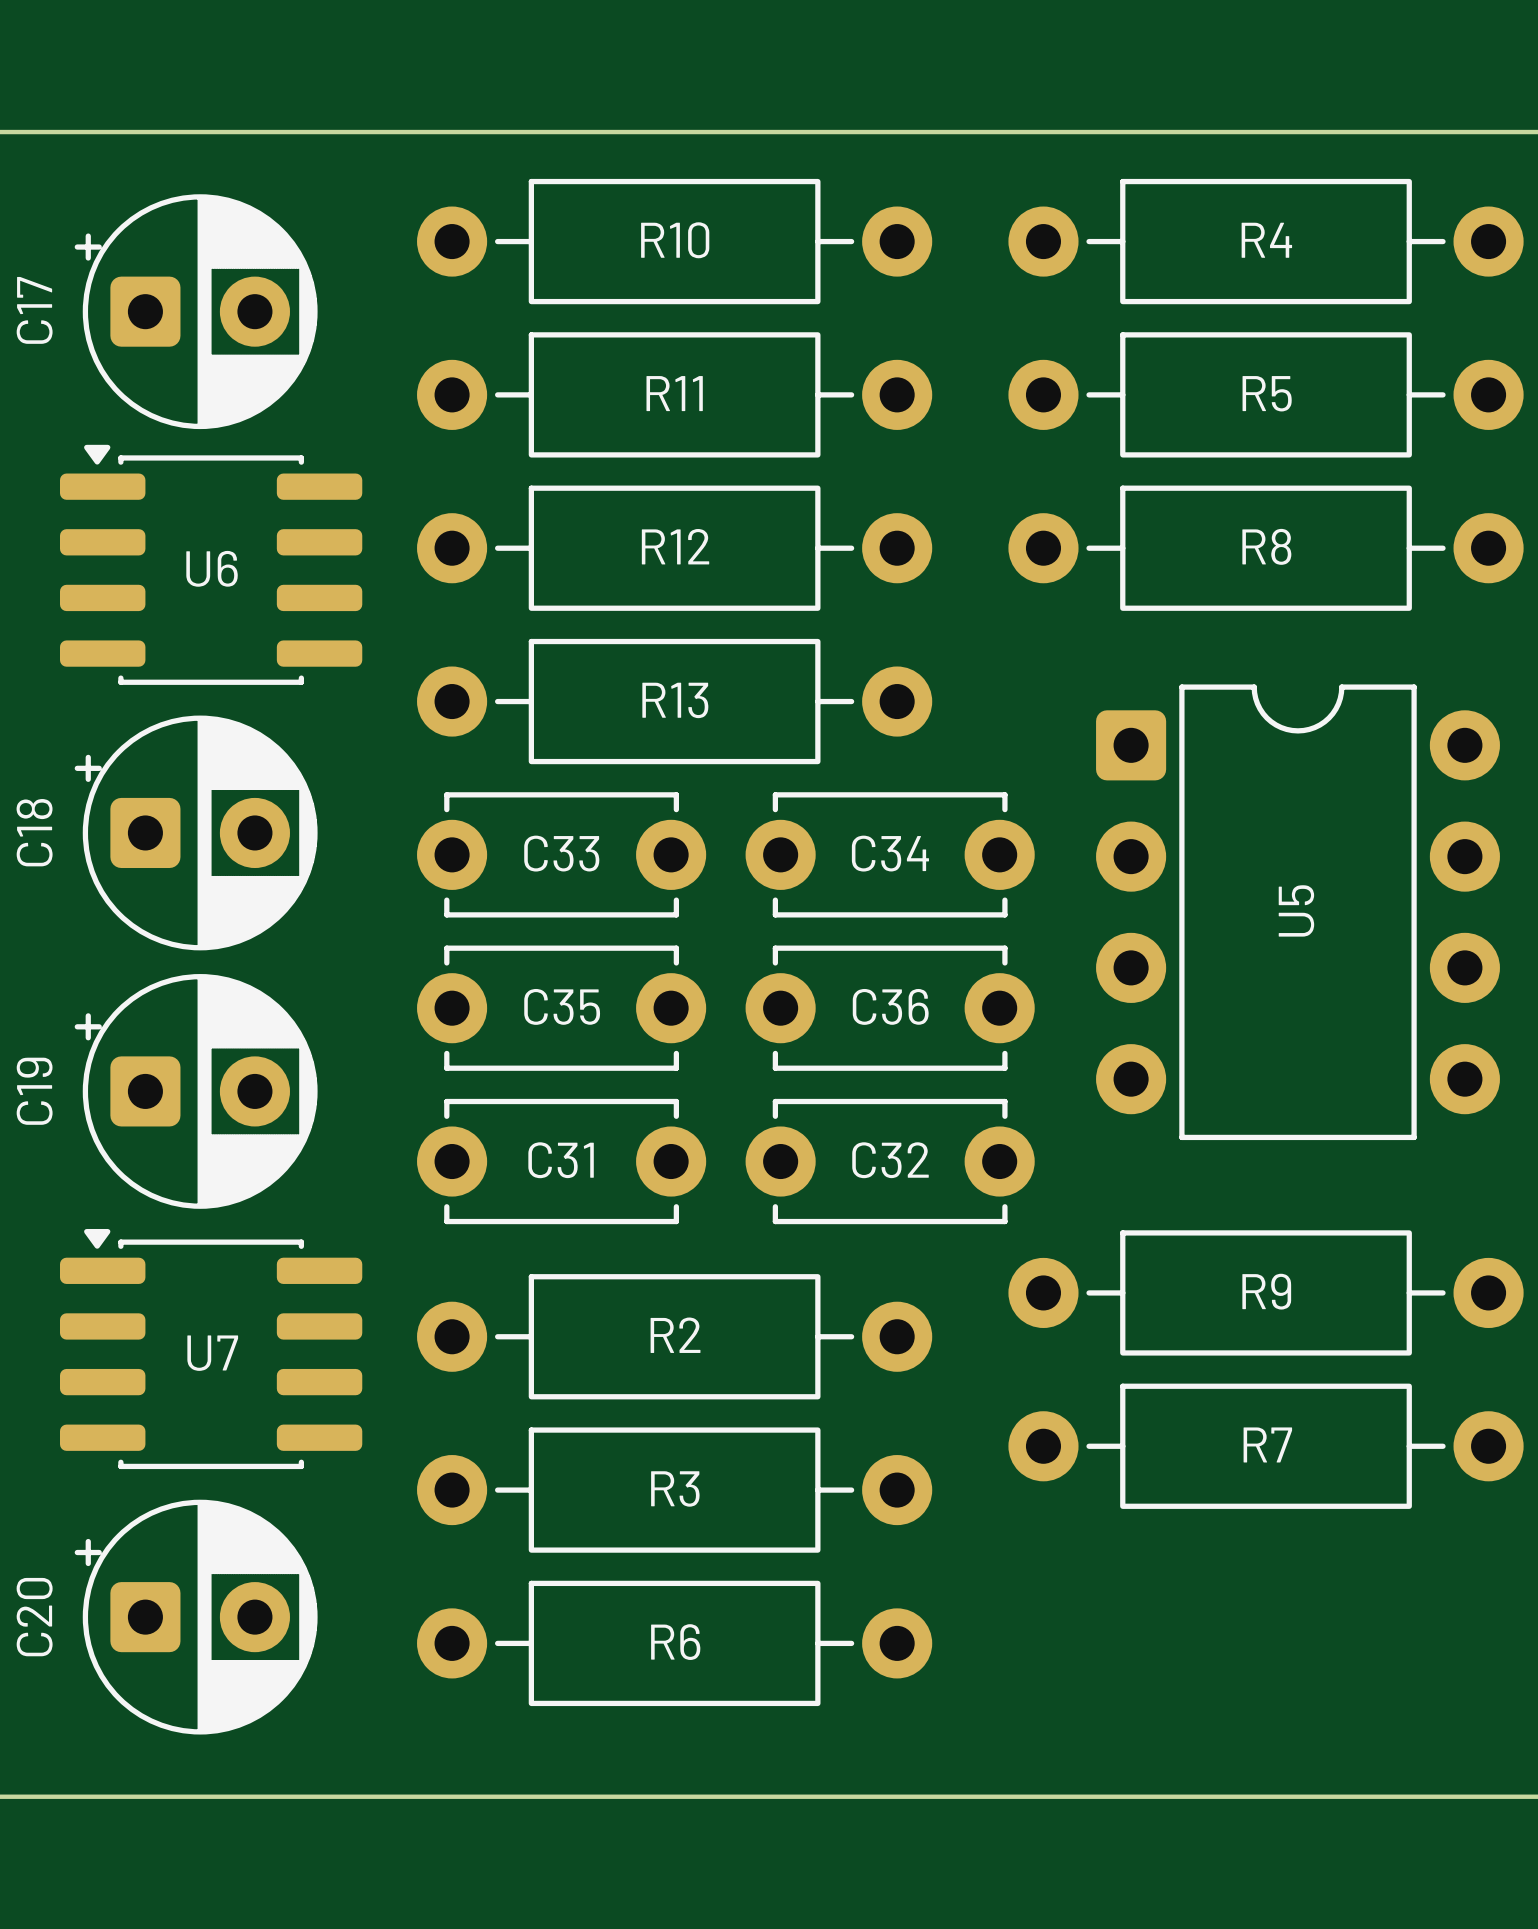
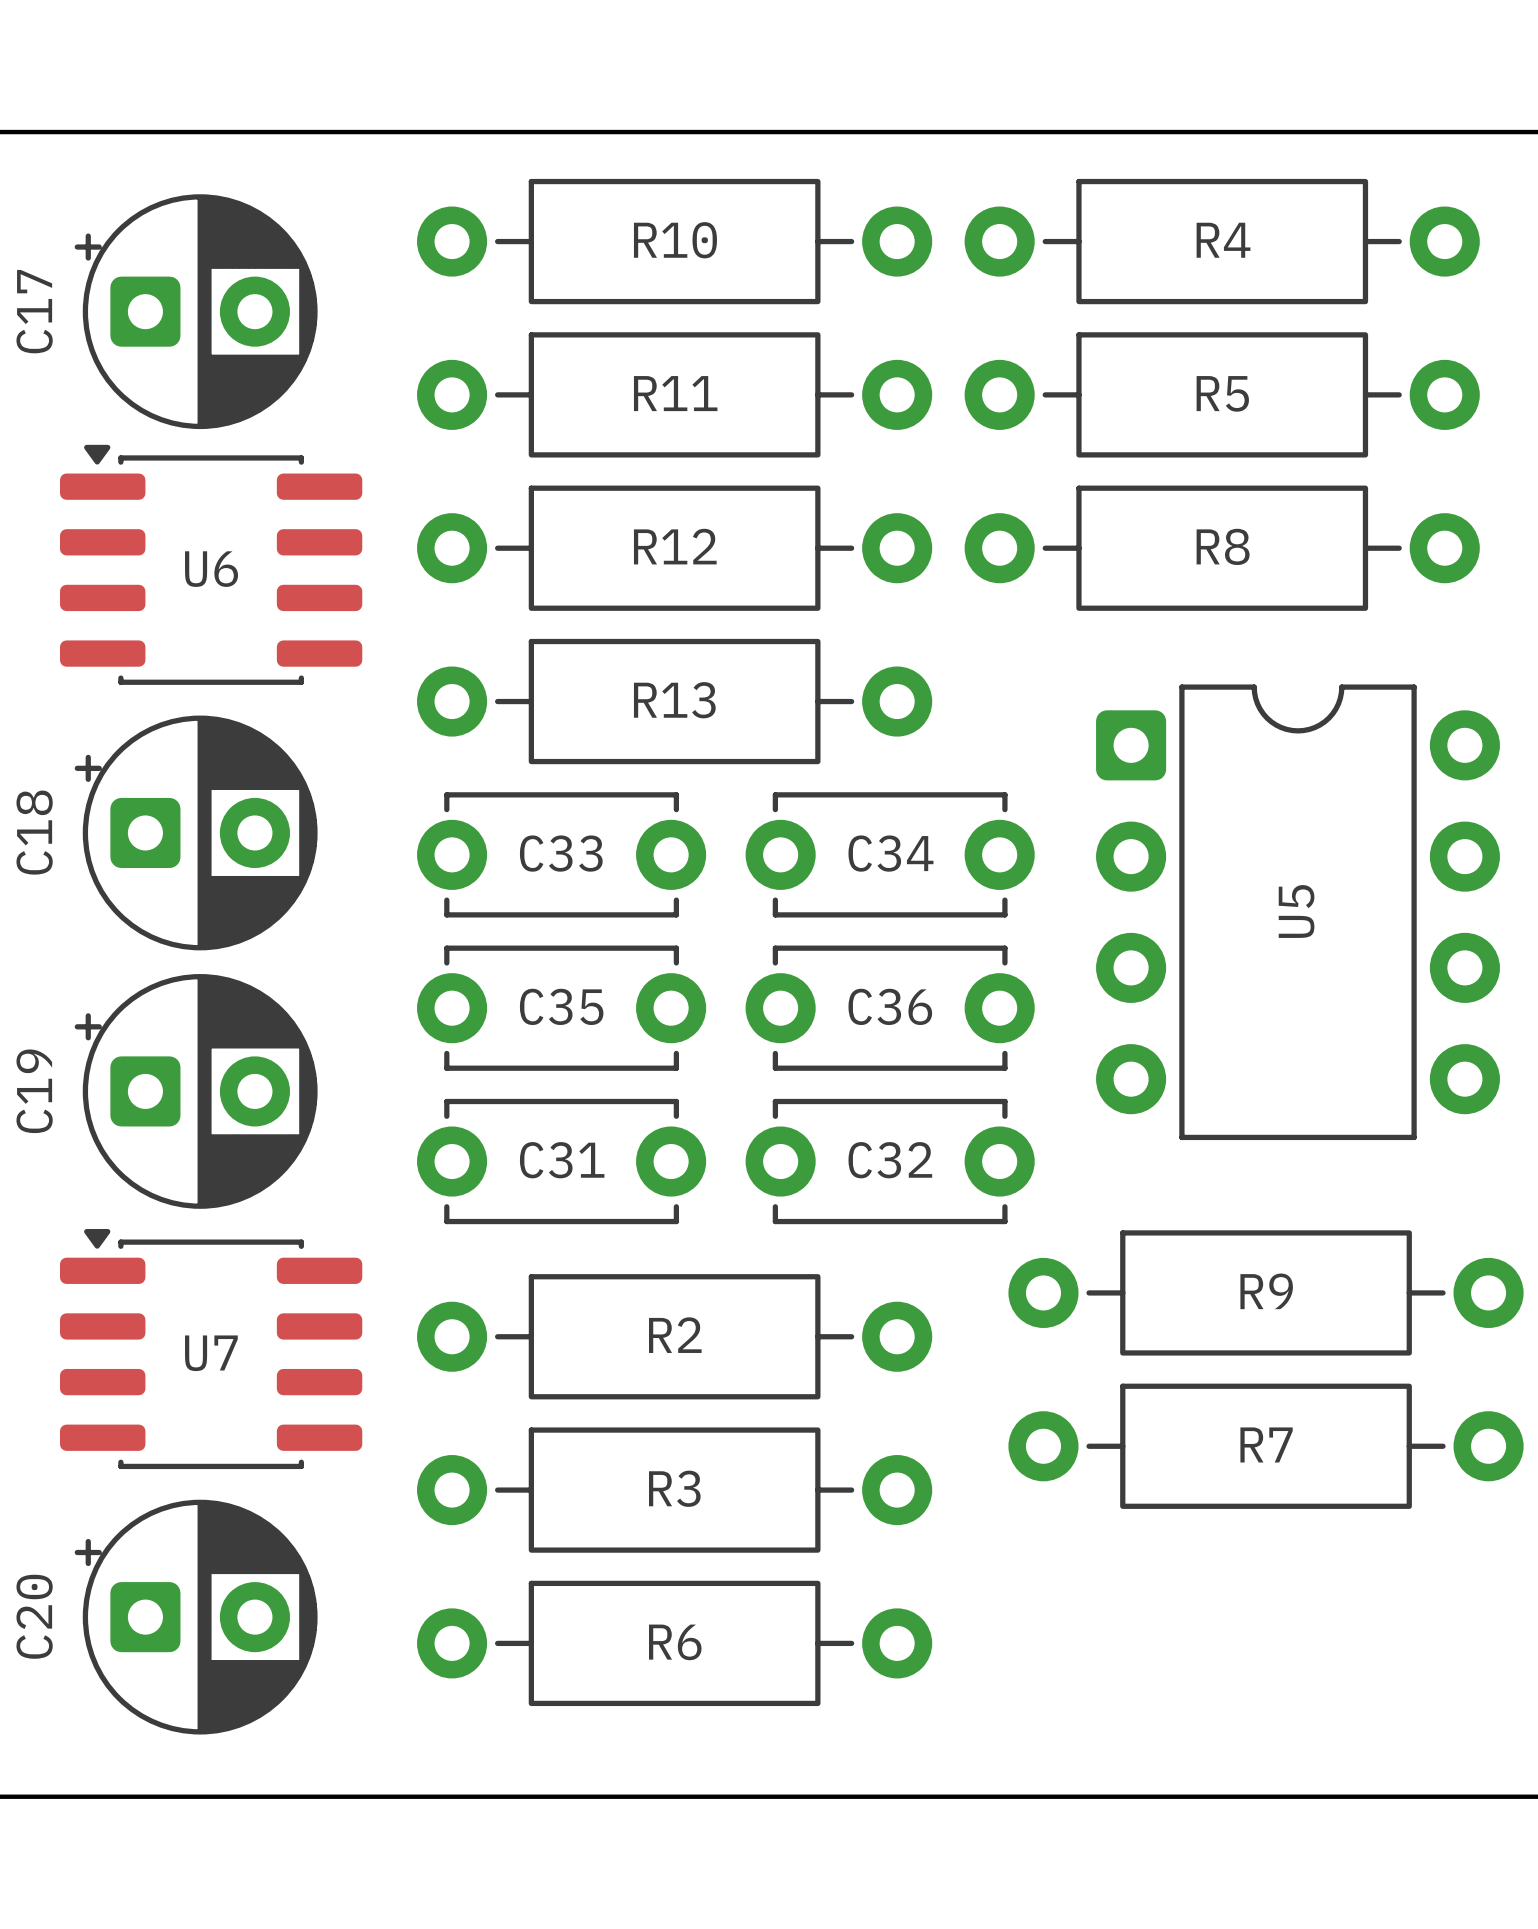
R4 position: (1266, 241) -> (1222, 241)
R5 position: (1266, 394) -> (1222, 394)
R8 position: (1266, 548) -> (1222, 548)

